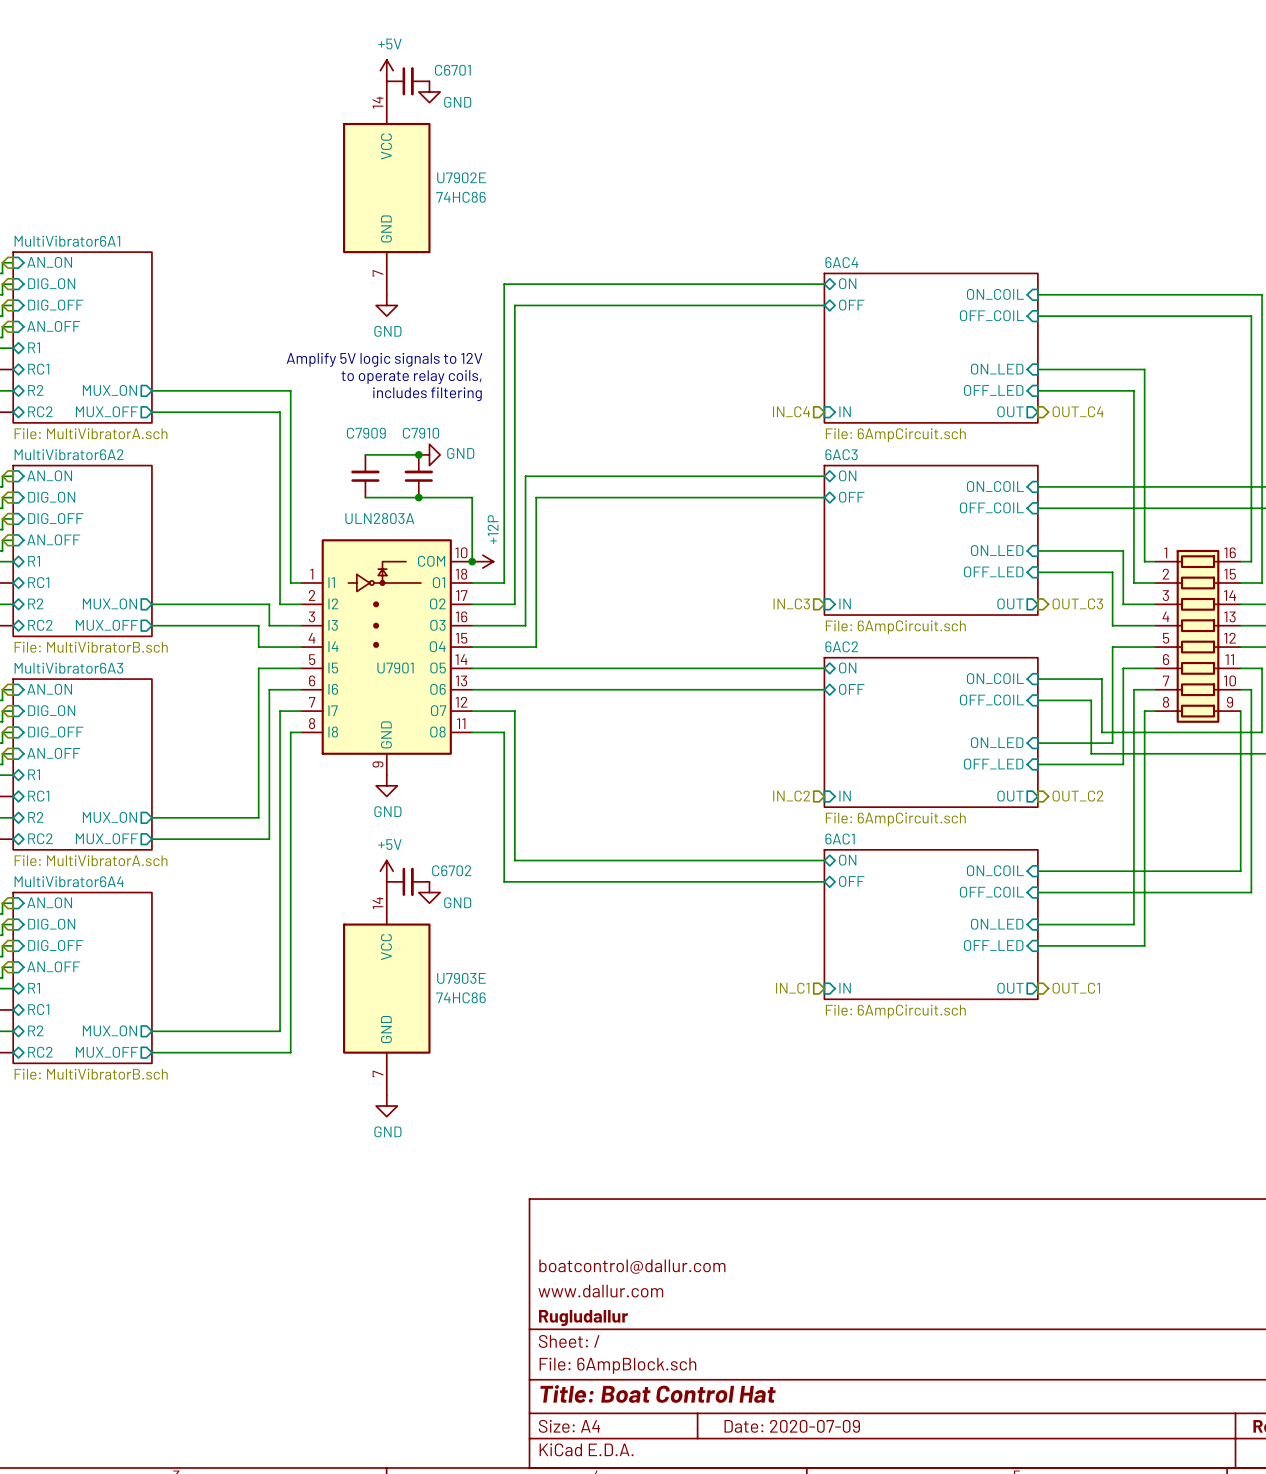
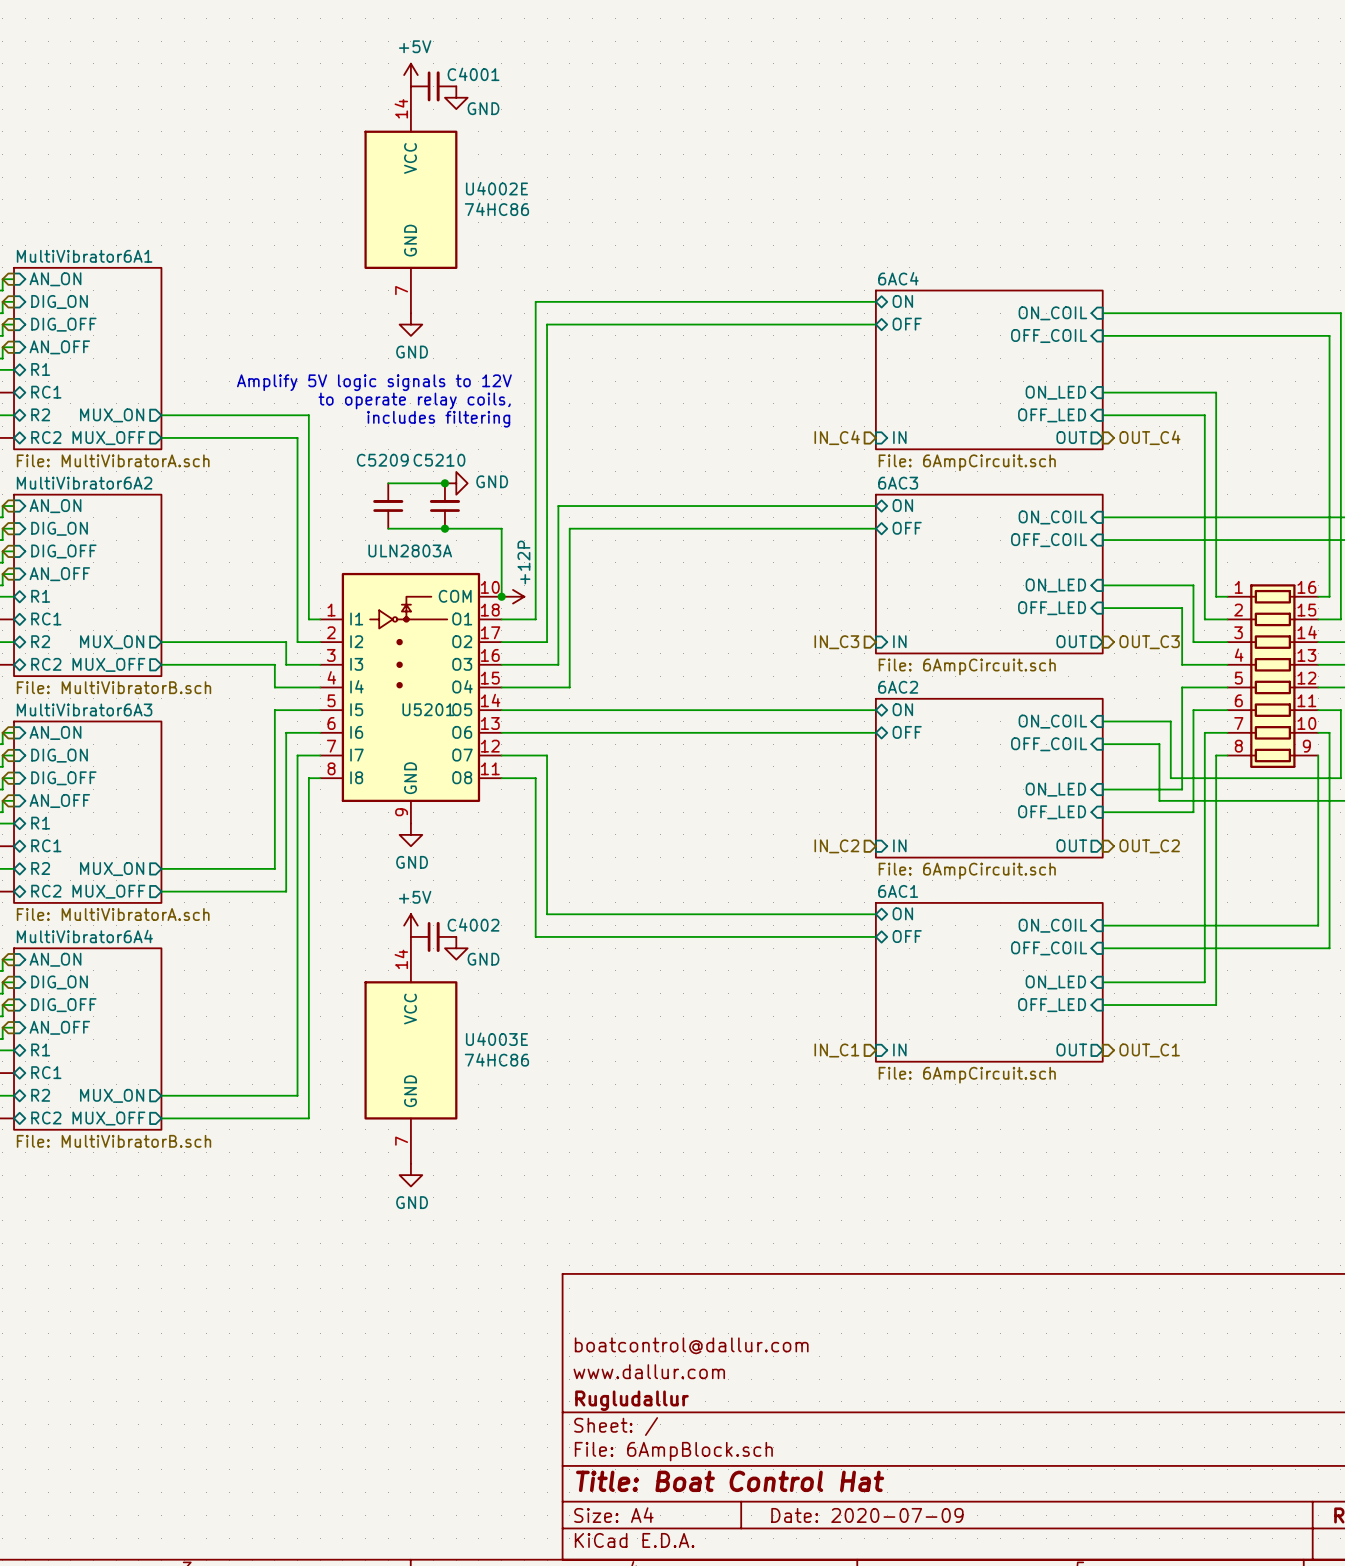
C6701 name: C6701 (452, 70) -> C4001 (473, 74)
U7902E name: U7902E (461, 177) -> U4002E (496, 188)
C7909 name: C7909 (366, 433) -> C5209 (382, 460)
C7910 name: C7910 (420, 433) -> C5210 (439, 460)
U7901 name: U7901 (395, 667) -> U5201 (428, 709)
C6702 name: C6702 (451, 870) -> C4002 (473, 924)
U7903E name: U7903E (461, 978) -> U4003E (496, 1039)

